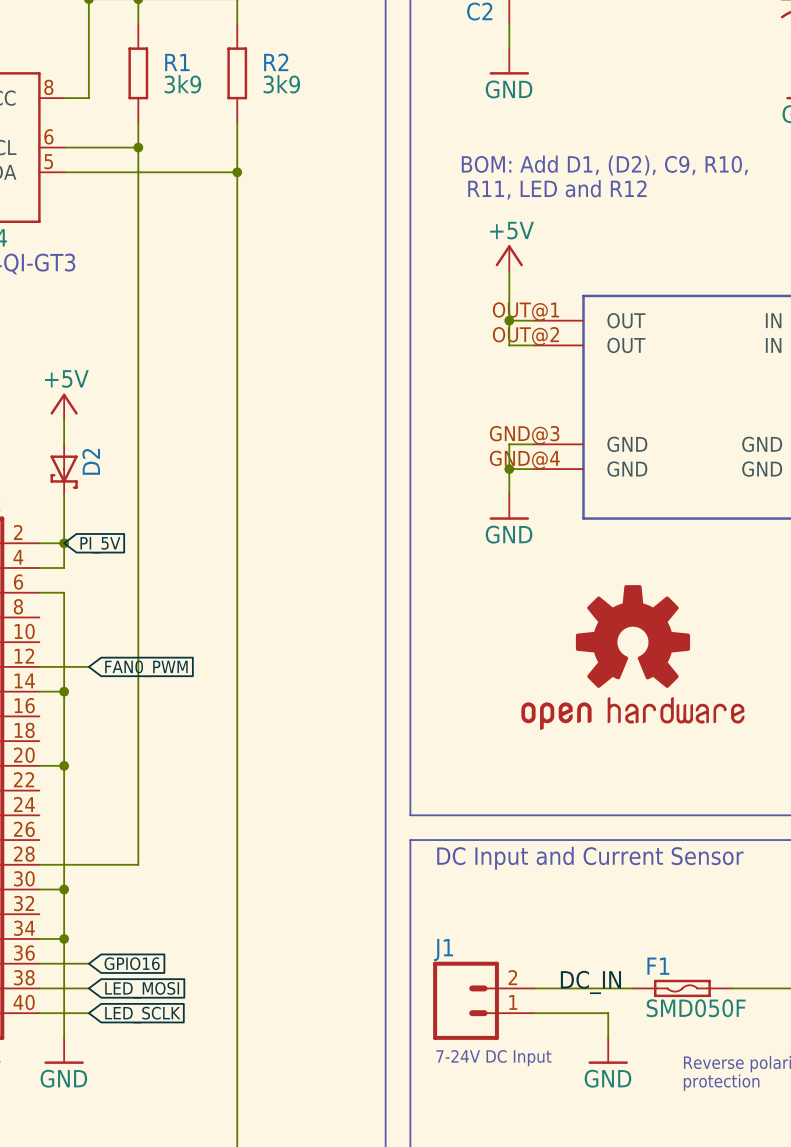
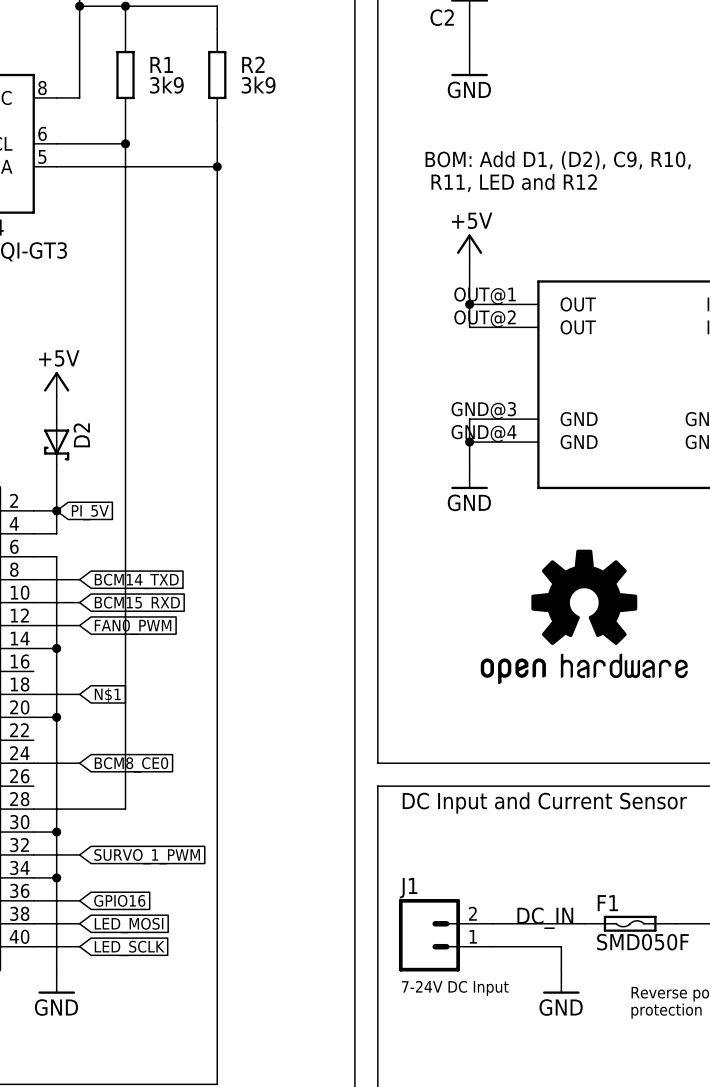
wire: none -> (33, 579) (79, 579)
global label: none -> BCM14_TXD (136, 581)
wire: none -> (33, 602) (79, 602)
global label: none -> BCM15_RXD (137, 604)
wire: none -> (33, 694) (79, 694)
global label: none -> N$1 (107, 695)
wire: none -> (33, 763) (79, 763)
global label: none -> BCM8_CE0 (131, 764)
wire: none -> (33, 854) (79, 854)
global label: none -> SURVO_1_PWM (147, 856)

